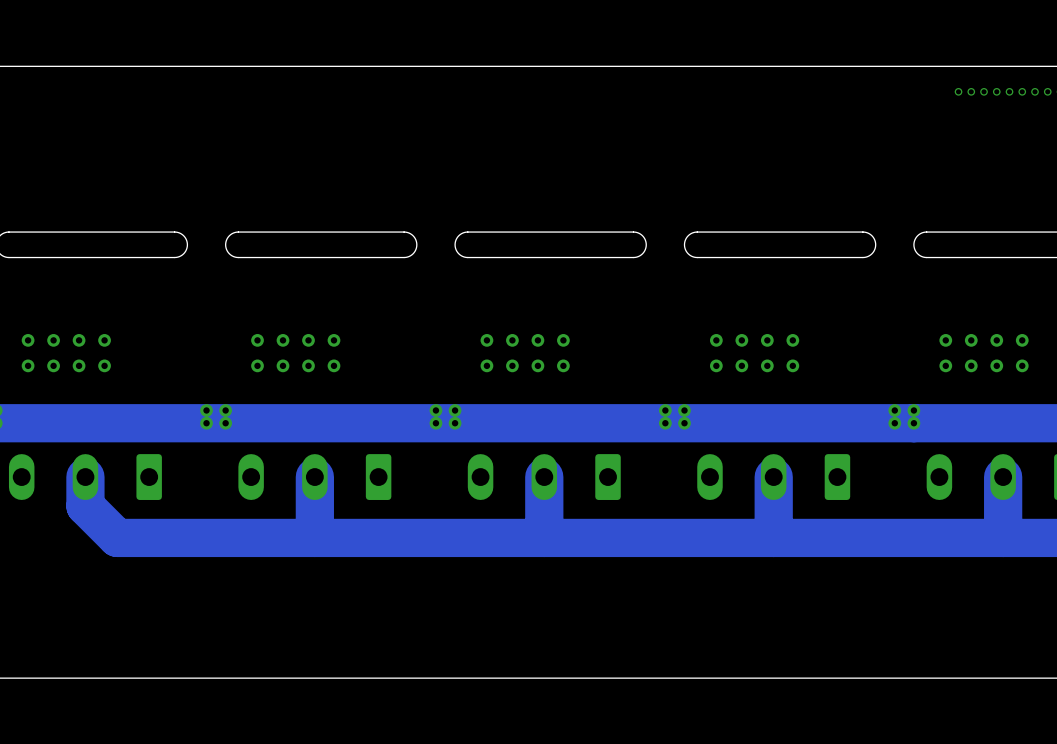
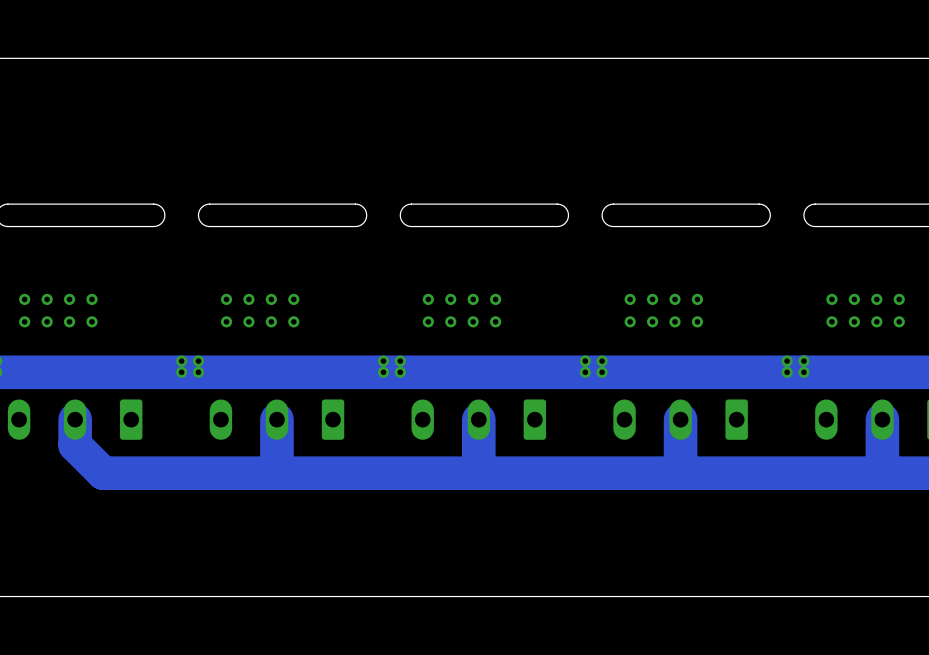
via: (958, 91) -> none
via: (971, 91) -> none
via: (984, 91) -> none
via: (996, 91) -> none
via: (1009, 91) -> none
via: (1022, 91) -> none
via: (1035, 91) -> none
via: (1047, 91) -> none

